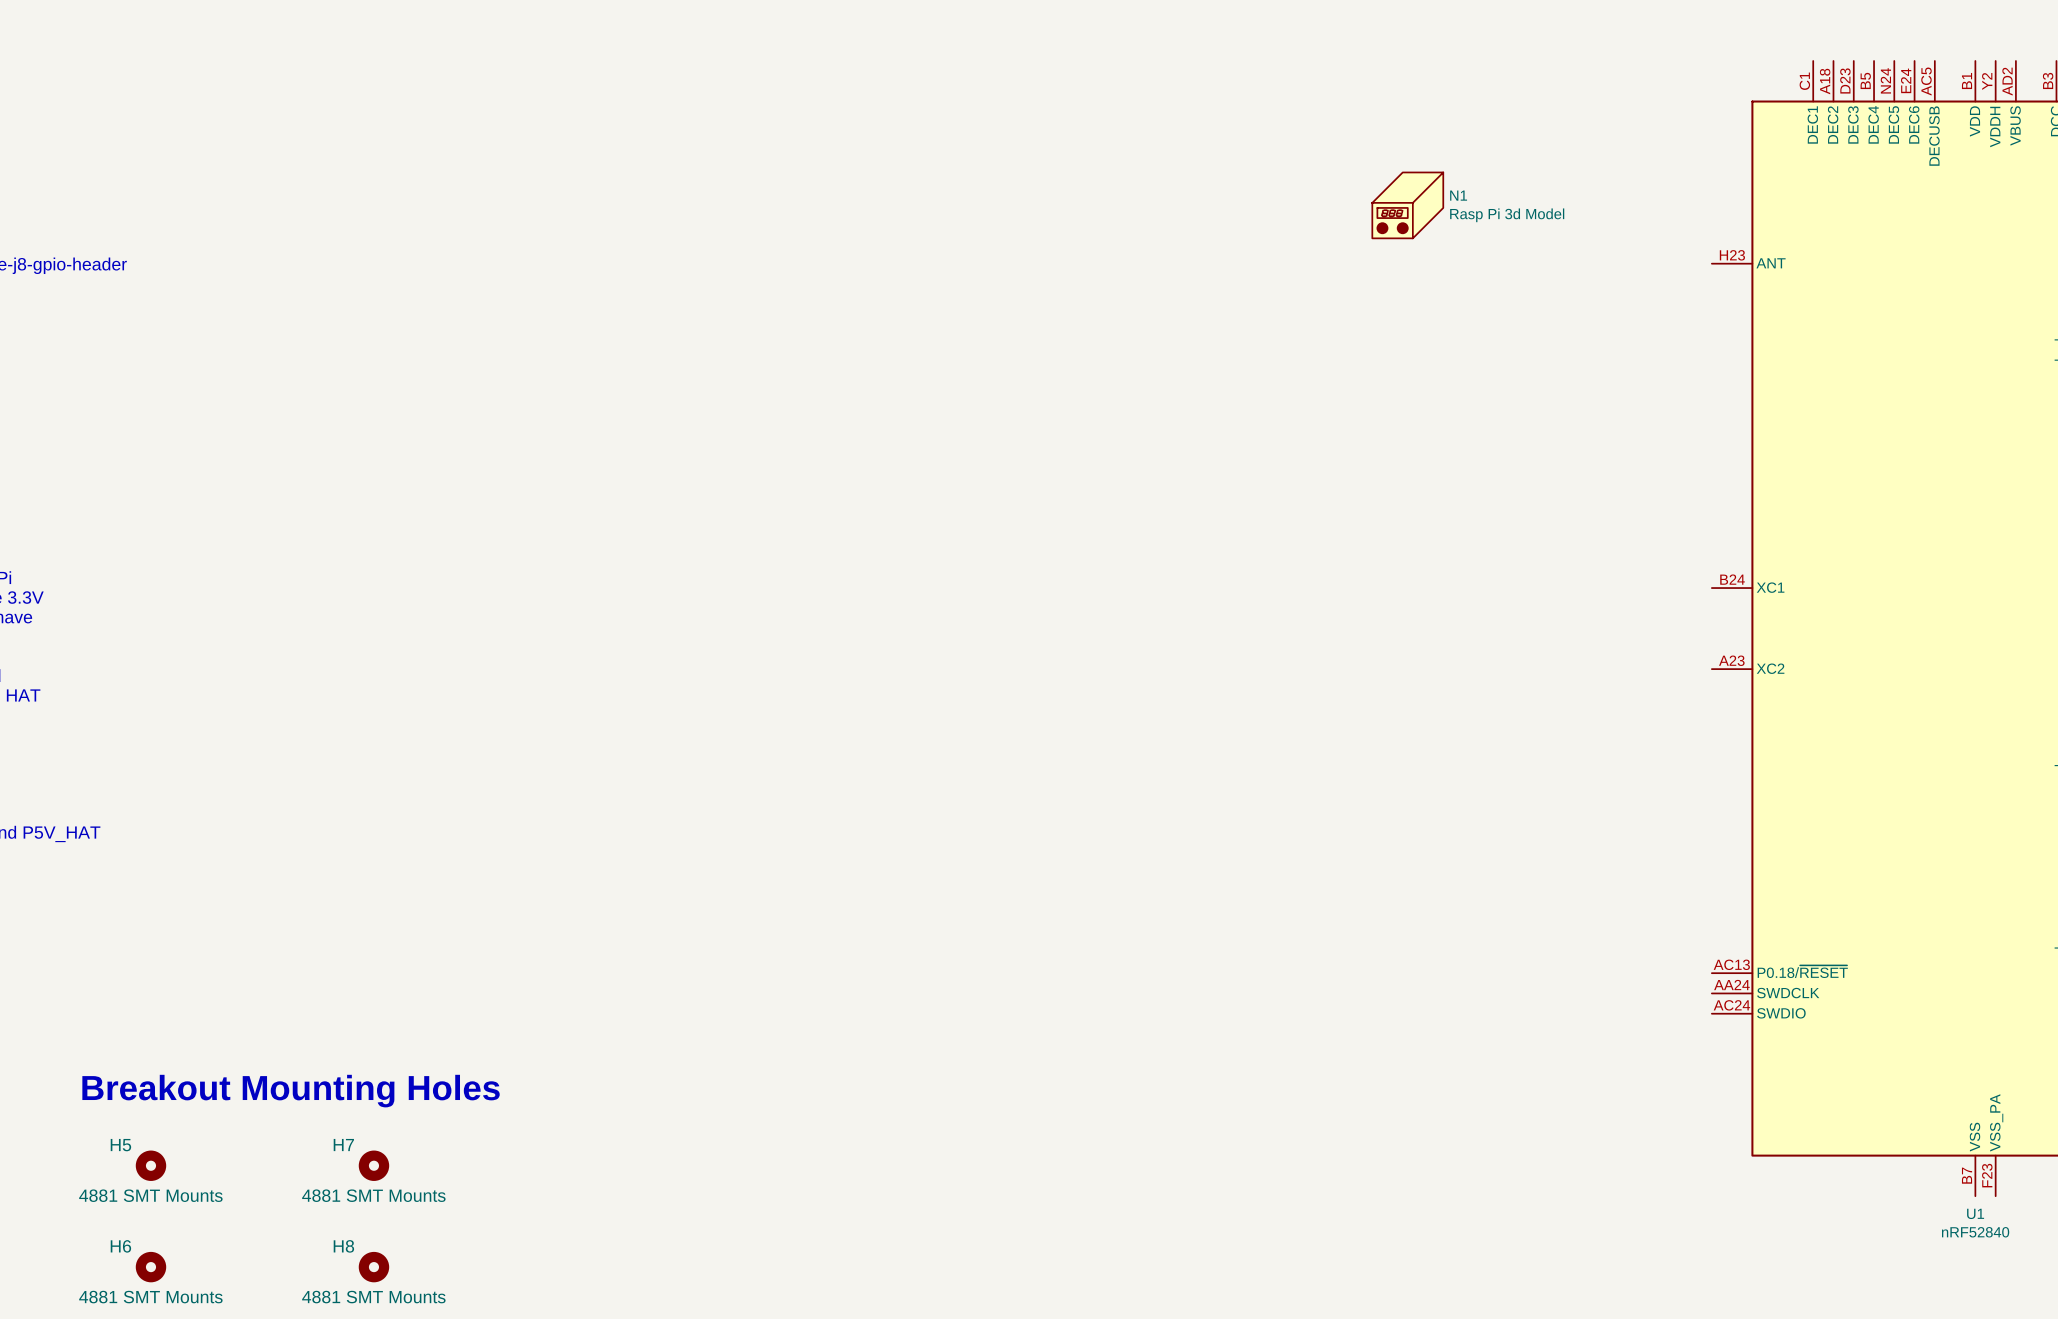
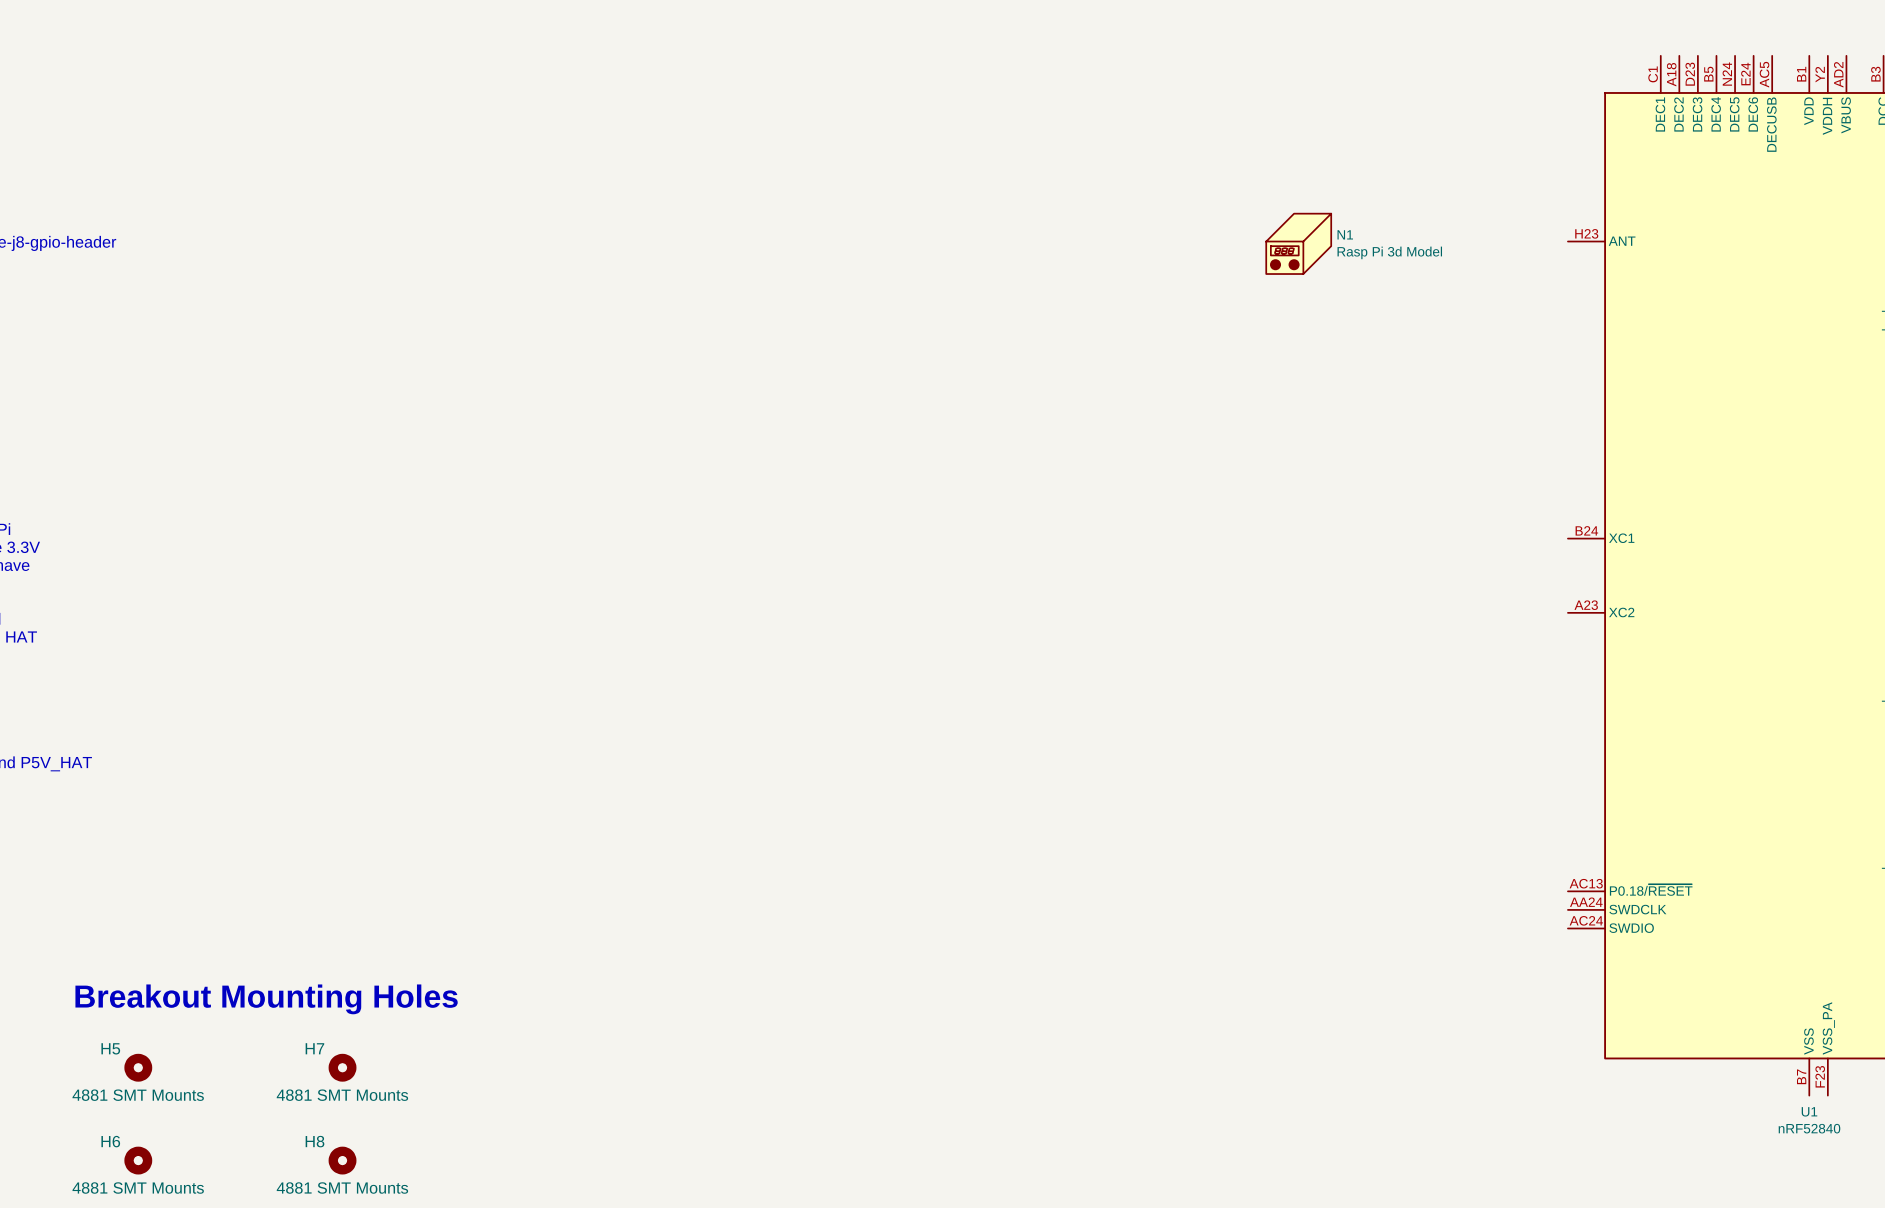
N1 position: (1407, 205) -> (1298, 243)

